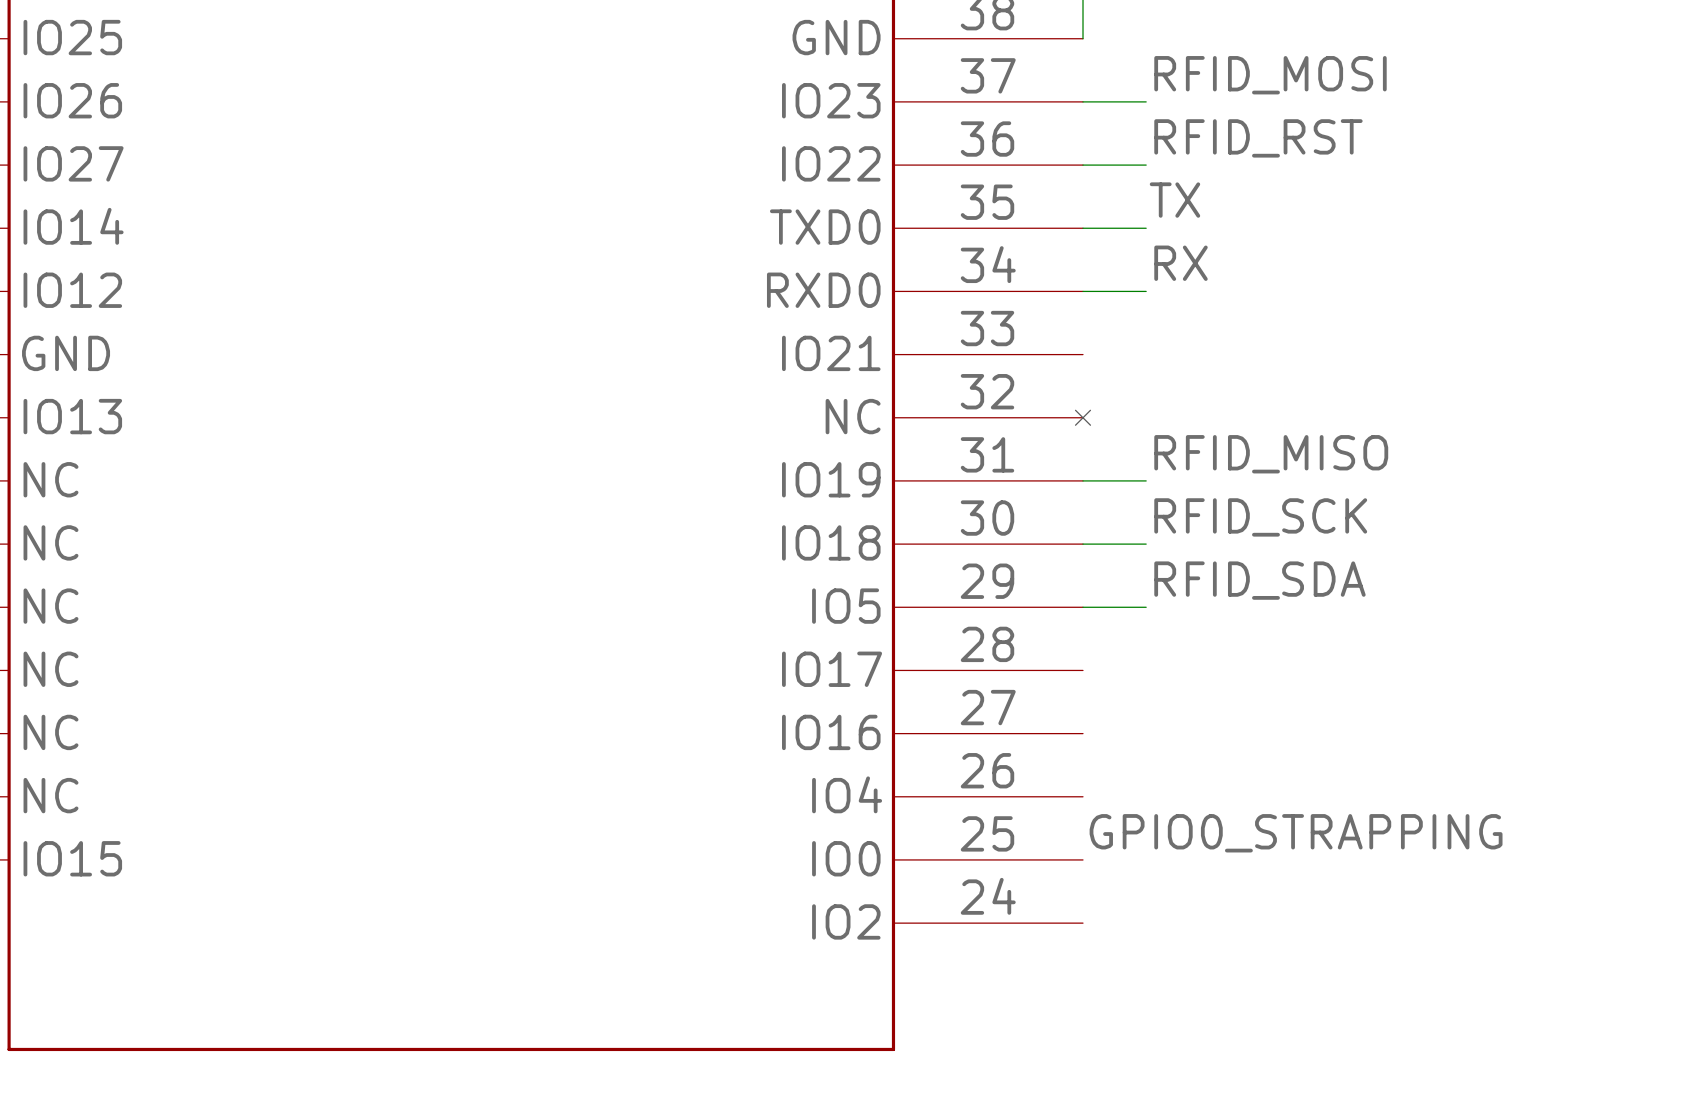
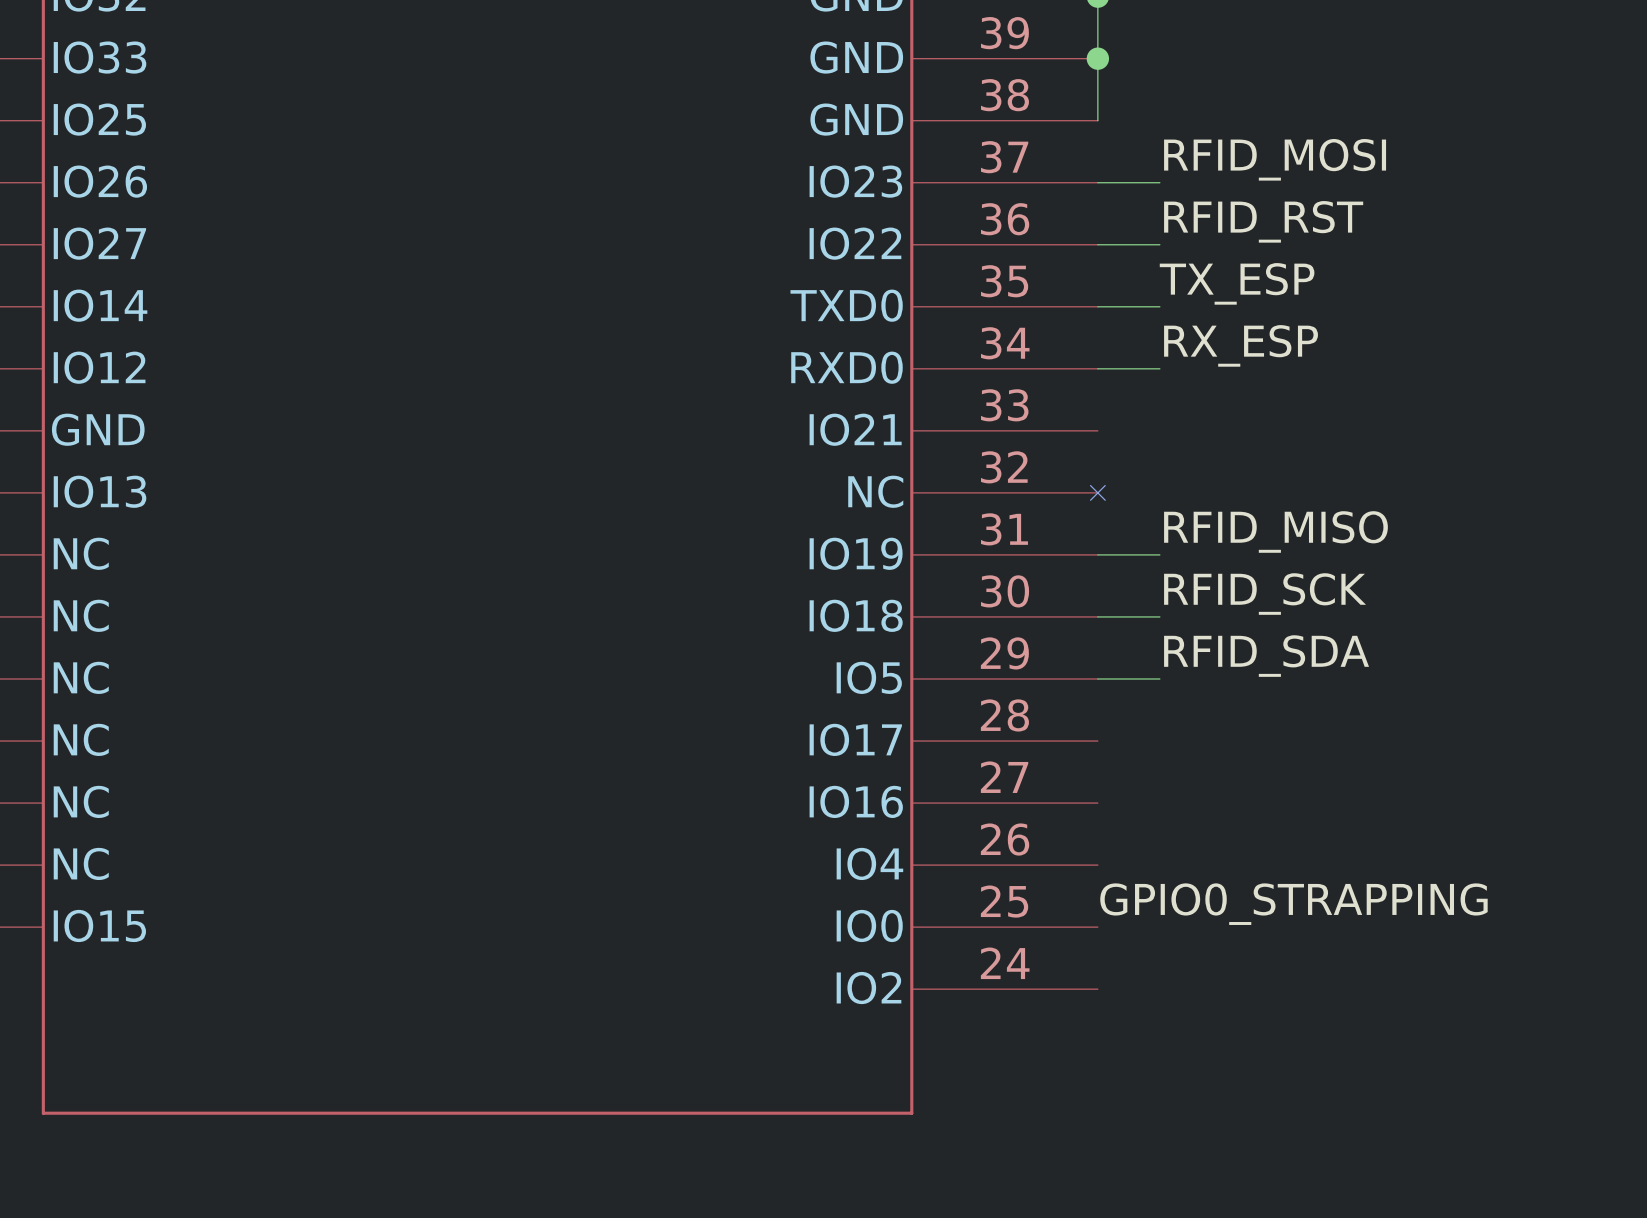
label: TX (1174, 200) -> TX_ESP (1237, 283)
label: RX (1181, 263) -> RX_ESP (1241, 345)

